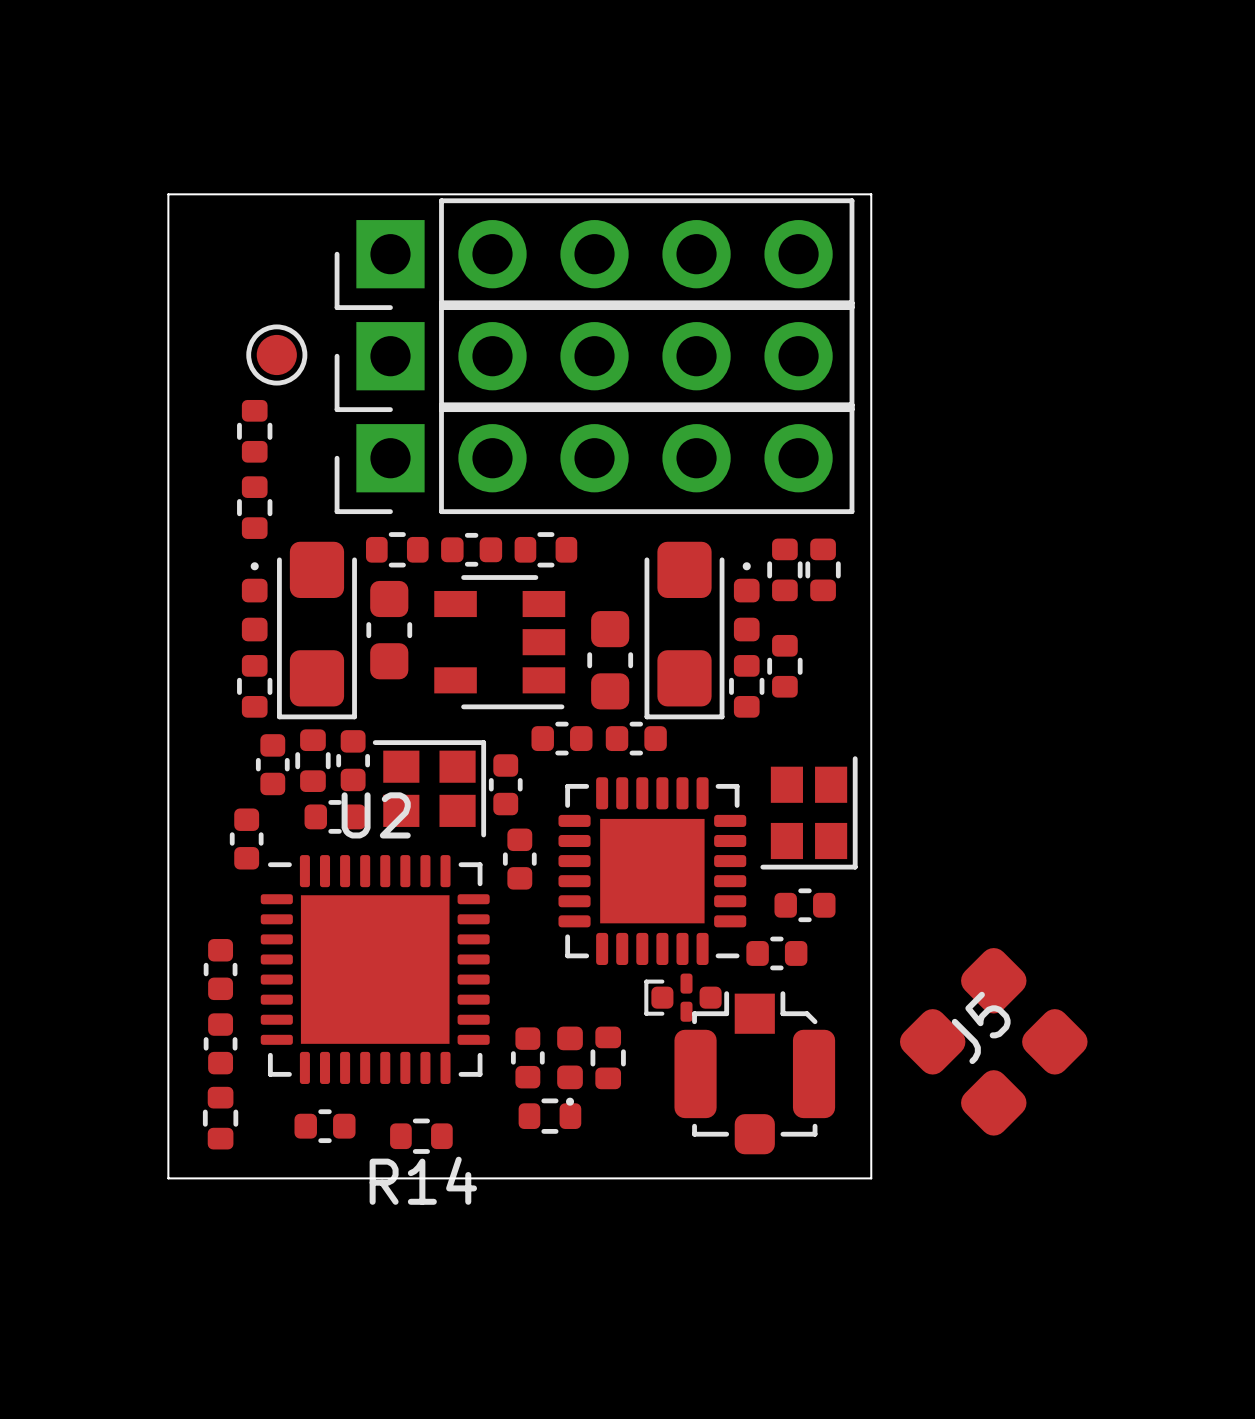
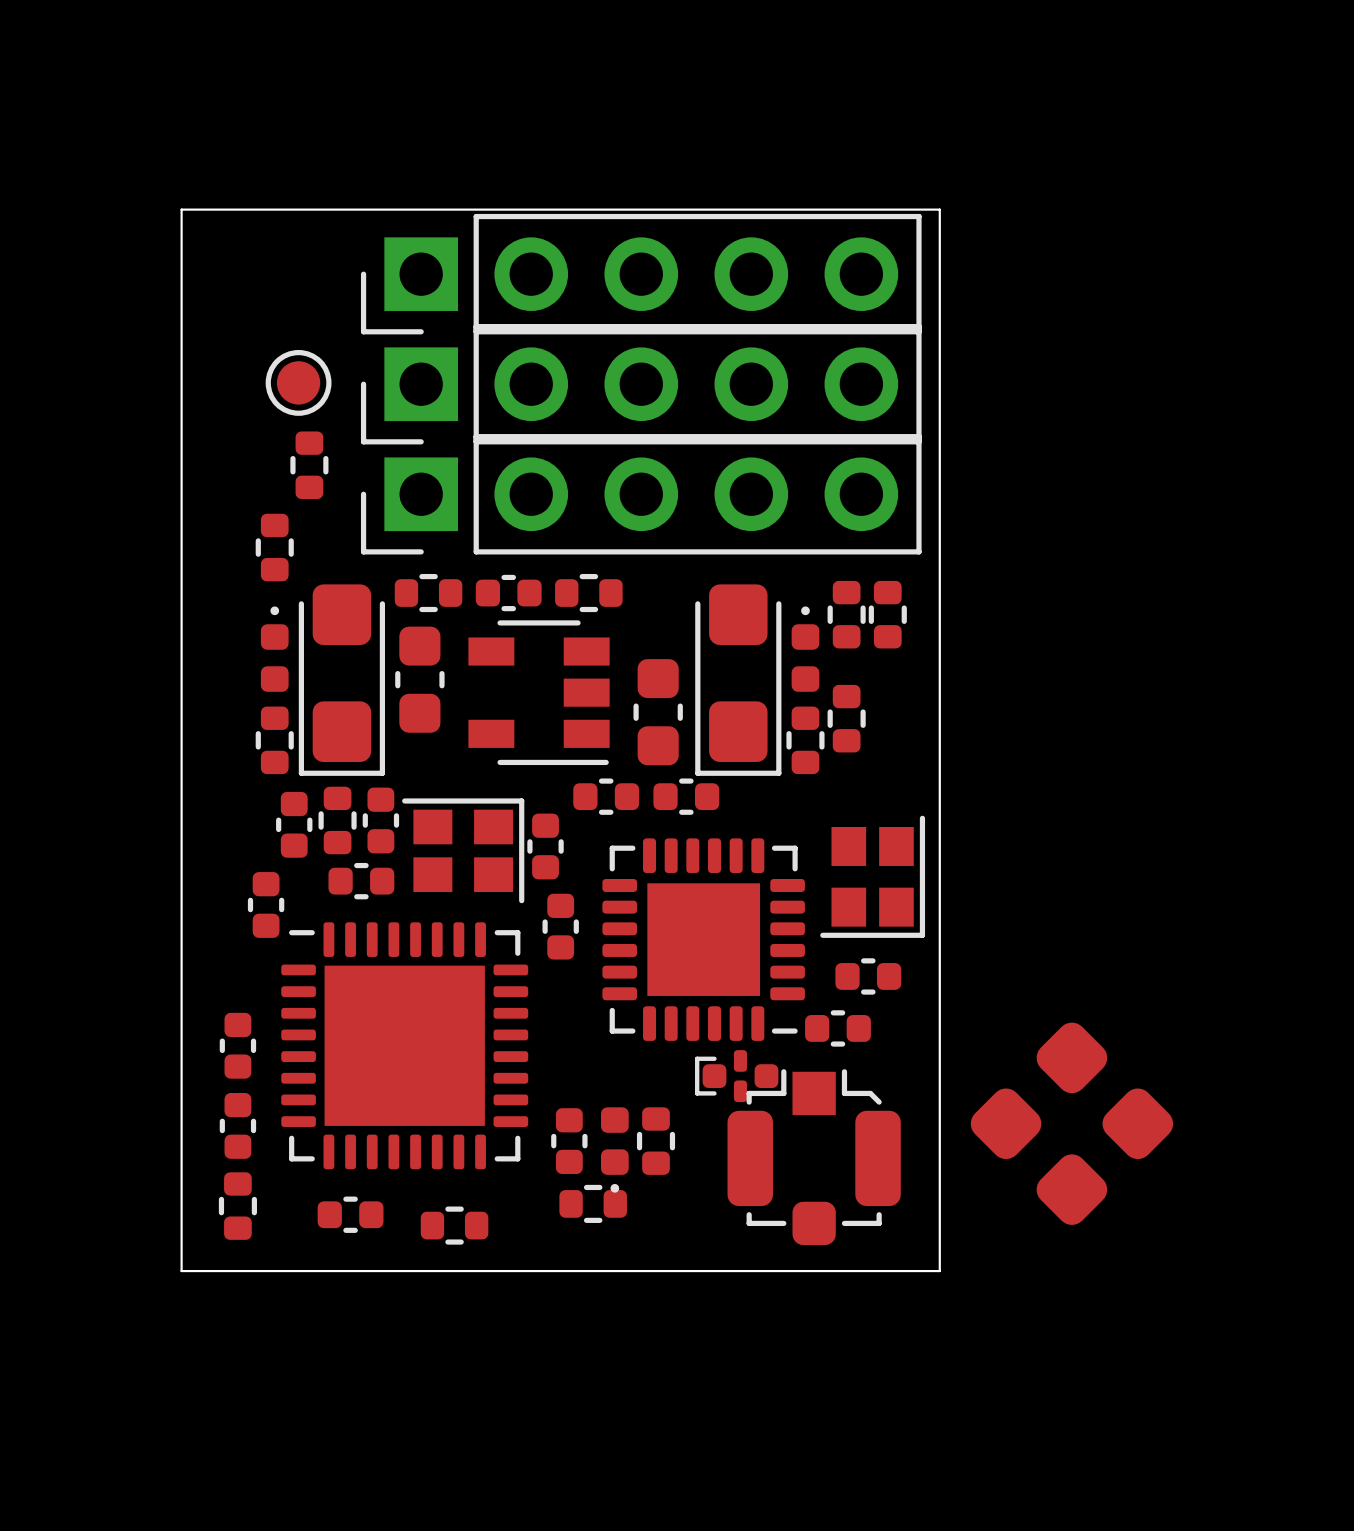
part position: (254, 431) -> (309, 465)
U2 name: U2 (376, 815) -> none
J5 name: J5 (981, 1027) -> none
R14 name: R14 (423, 1180) -> none

